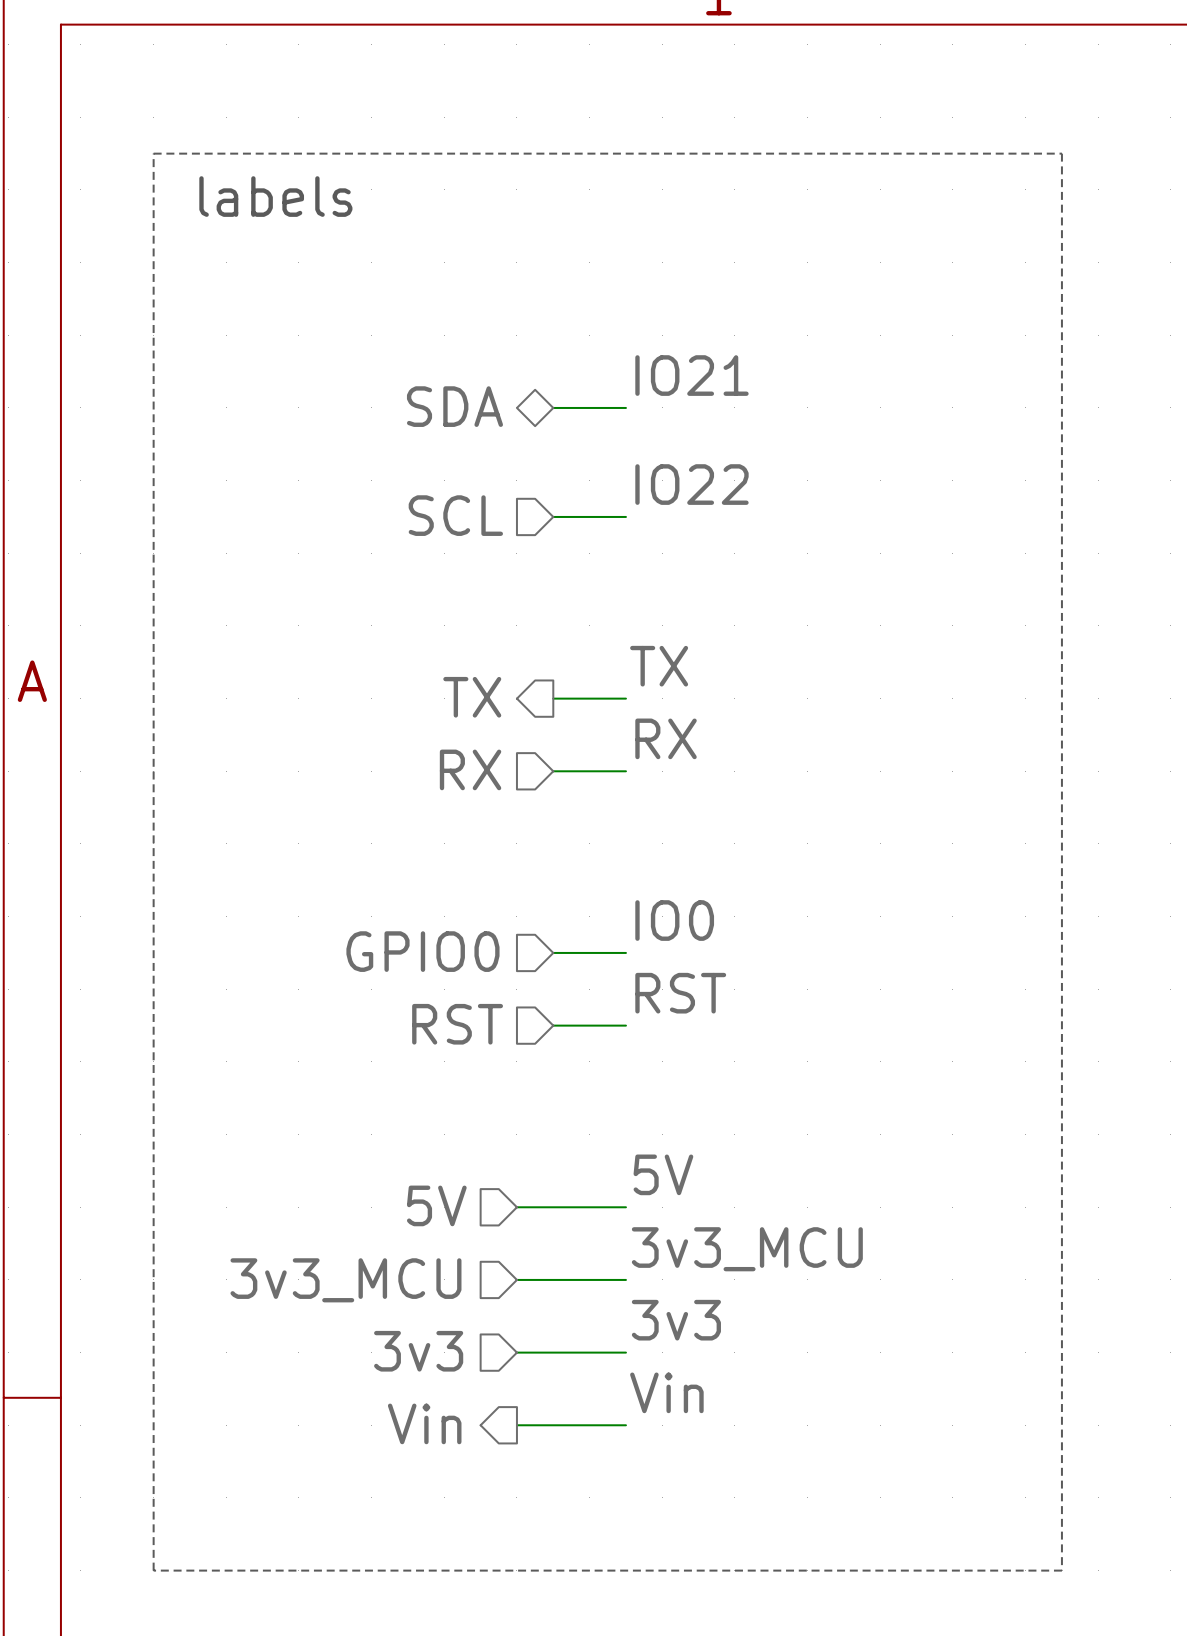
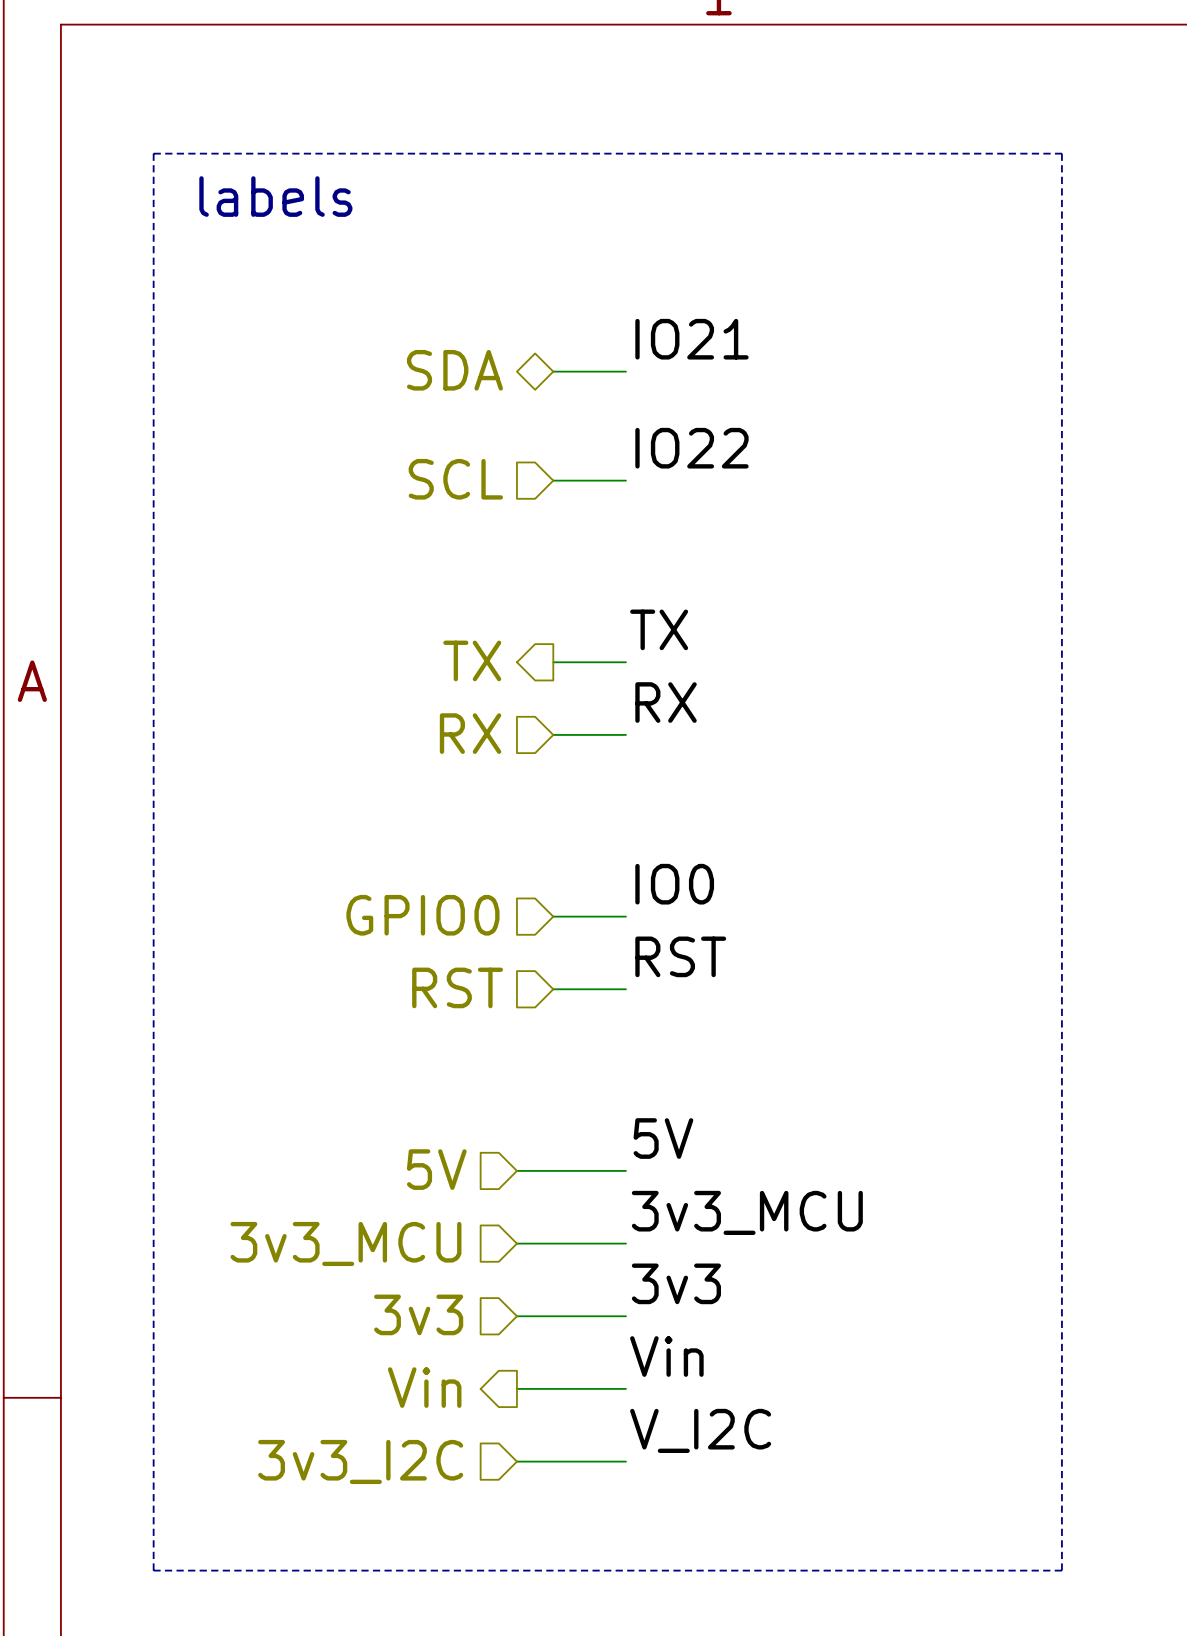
label position: IO21 (691, 375) -> IO21 (691, 339)
hierarchical label position: SDA (454, 406) -> SDA (454, 370)
wire: (553, 407) (625, 407) -> (553, 371) (625, 371)
label position: IO22 (691, 484) -> IO22 (691, 448)
hierarchical label position: SCL (455, 515) -> SCL (455, 479)
wire: (553, 516) (625, 516) -> (553, 480) (625, 480)
label position: TX (659, 666) -> TX (659, 629)
hierarchical label position: TX (472, 697) -> TX (472, 660)
wire: (553, 698) (625, 698) -> (553, 662) (625, 662)
label position: RX (666, 738) -> RX (666, 702)
hierarchical label position: RX (470, 769) -> RX (470, 733)
wire: (553, 771) (625, 771) -> (553, 734) (625, 734)
label position: IO0 (674, 920) -> IO0 (674, 884)
hierarchical label position: GPIO0 (422, 951) -> GPIO0 (422, 915)
wire: (553, 952) (625, 952) -> (553, 916) (625, 916)
label position: RST (680, 993) -> RST (680, 956)
hierarchical label position: RST (457, 1024) -> RST (457, 987)
wire: (553, 1025) (625, 1025) -> (553, 989) (625, 989)
label position: 5V (663, 1174) -> 5V (663, 1138)
hierarchical label position: 5V (436, 1205) -> 5V (436, 1169)
wire: (516, 1207) (625, 1207) -> (516, 1170) (625, 1170)
label position: 3v3_MCU (747, 1249) -> 3v3_MCU (747, 1212)
wire: (516, 1279) (625, 1279) -> (516, 1243) (625, 1243)
hierarchical label position: 3v3_MCU (345, 1280) -> 3v3_MCU (345, 1243)
label position: 3v3 (676, 1320) -> 3v3 (676, 1283)
hierarchical label position: 3v3 (418, 1351) -> 3v3 (418, 1314)
wire: (516, 1352) (625, 1352) -> (516, 1316) (625, 1316)
label position: Vin (666, 1392) -> Vin (666, 1356)
hierarchical label position: Vin (424, 1423) -> Vin (424, 1387)
wire: (516, 1425) (625, 1425) -> (516, 1388) (625, 1388)
label: none -> V_I2C (700, 1430)
hierarchical label: none -> 3v3_I2C (360, 1461)
wire: none -> (516, 1461) (625, 1461)

